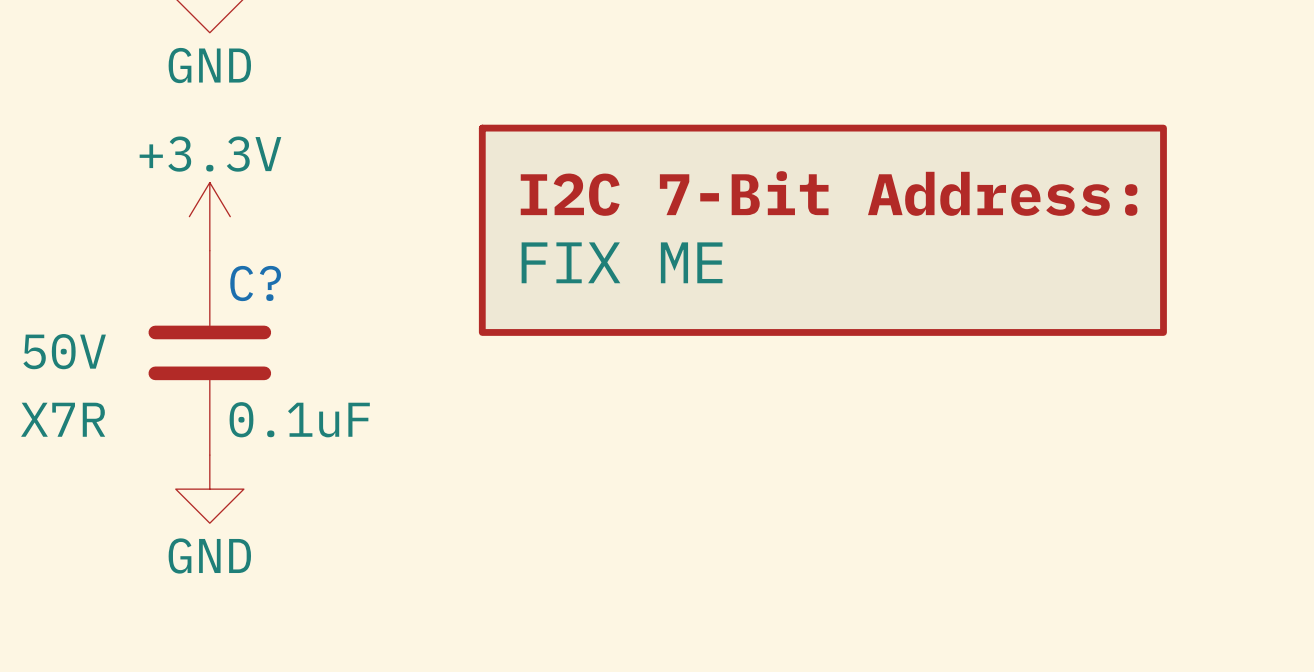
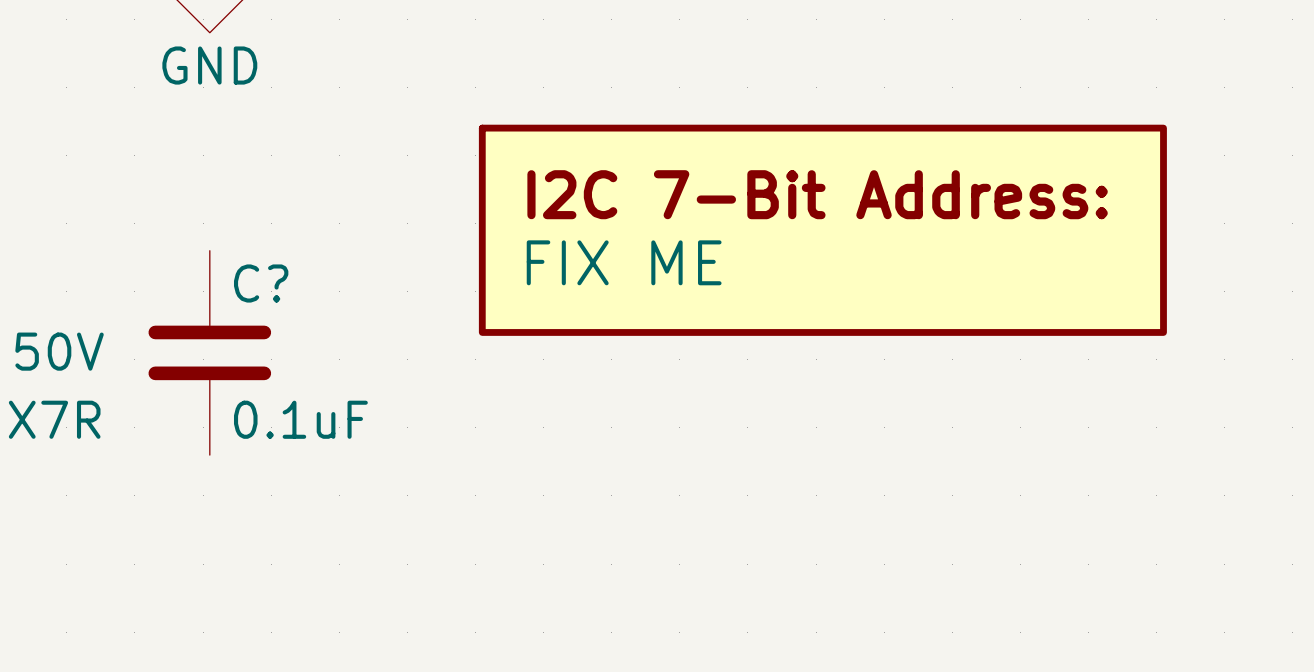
power symbol: +3.3V (209, 216) -> none
power symbol: GND (209, 489) -> none

